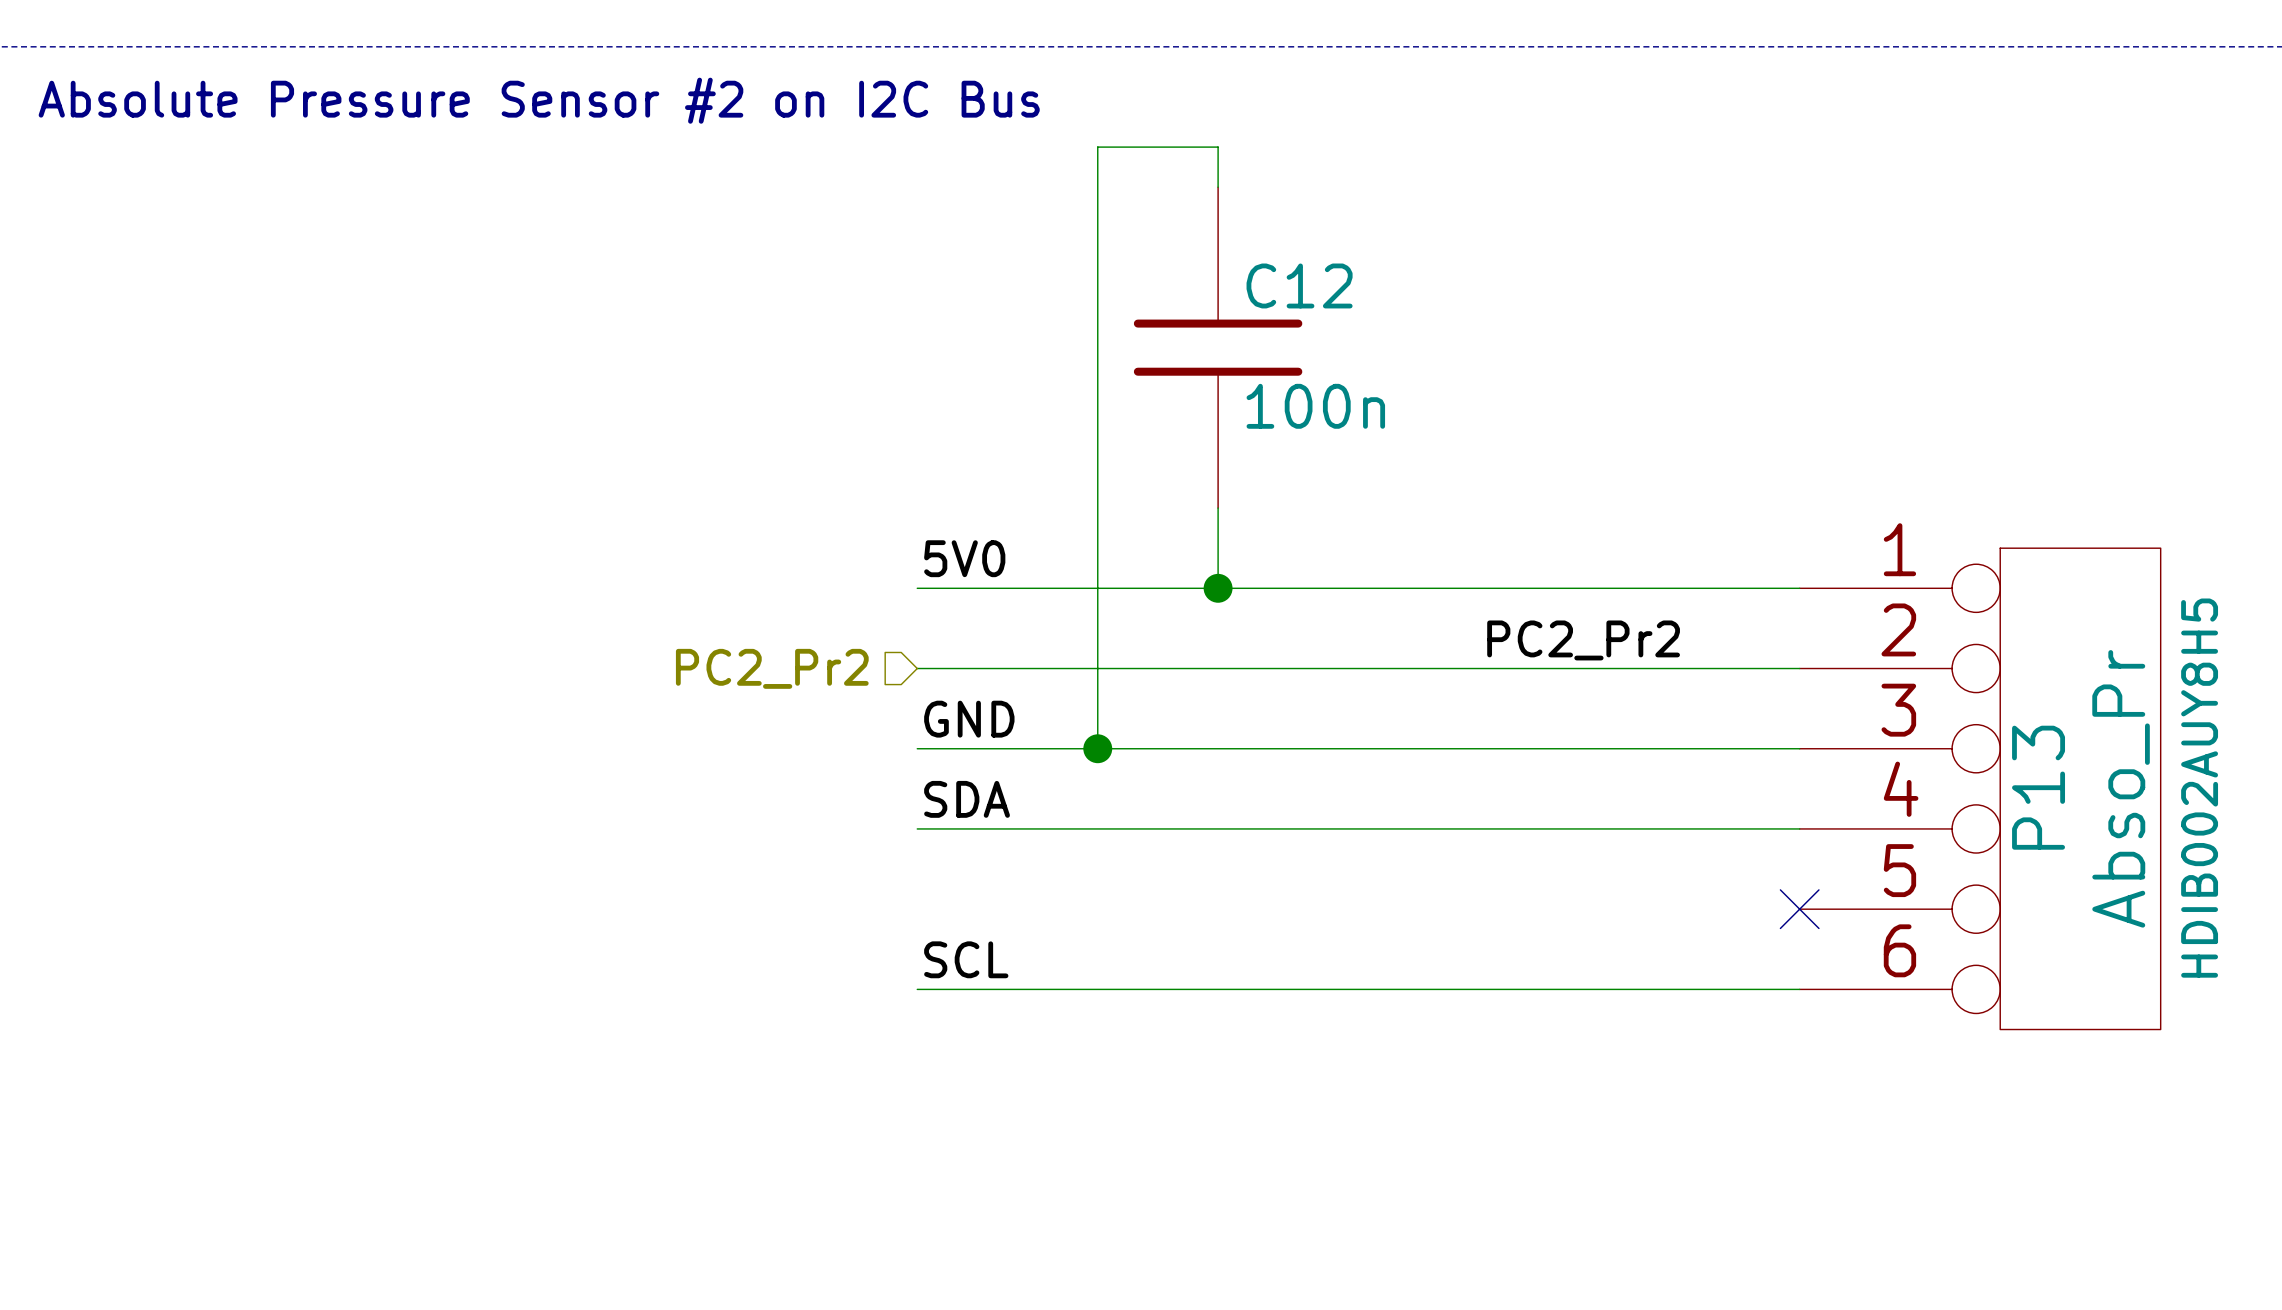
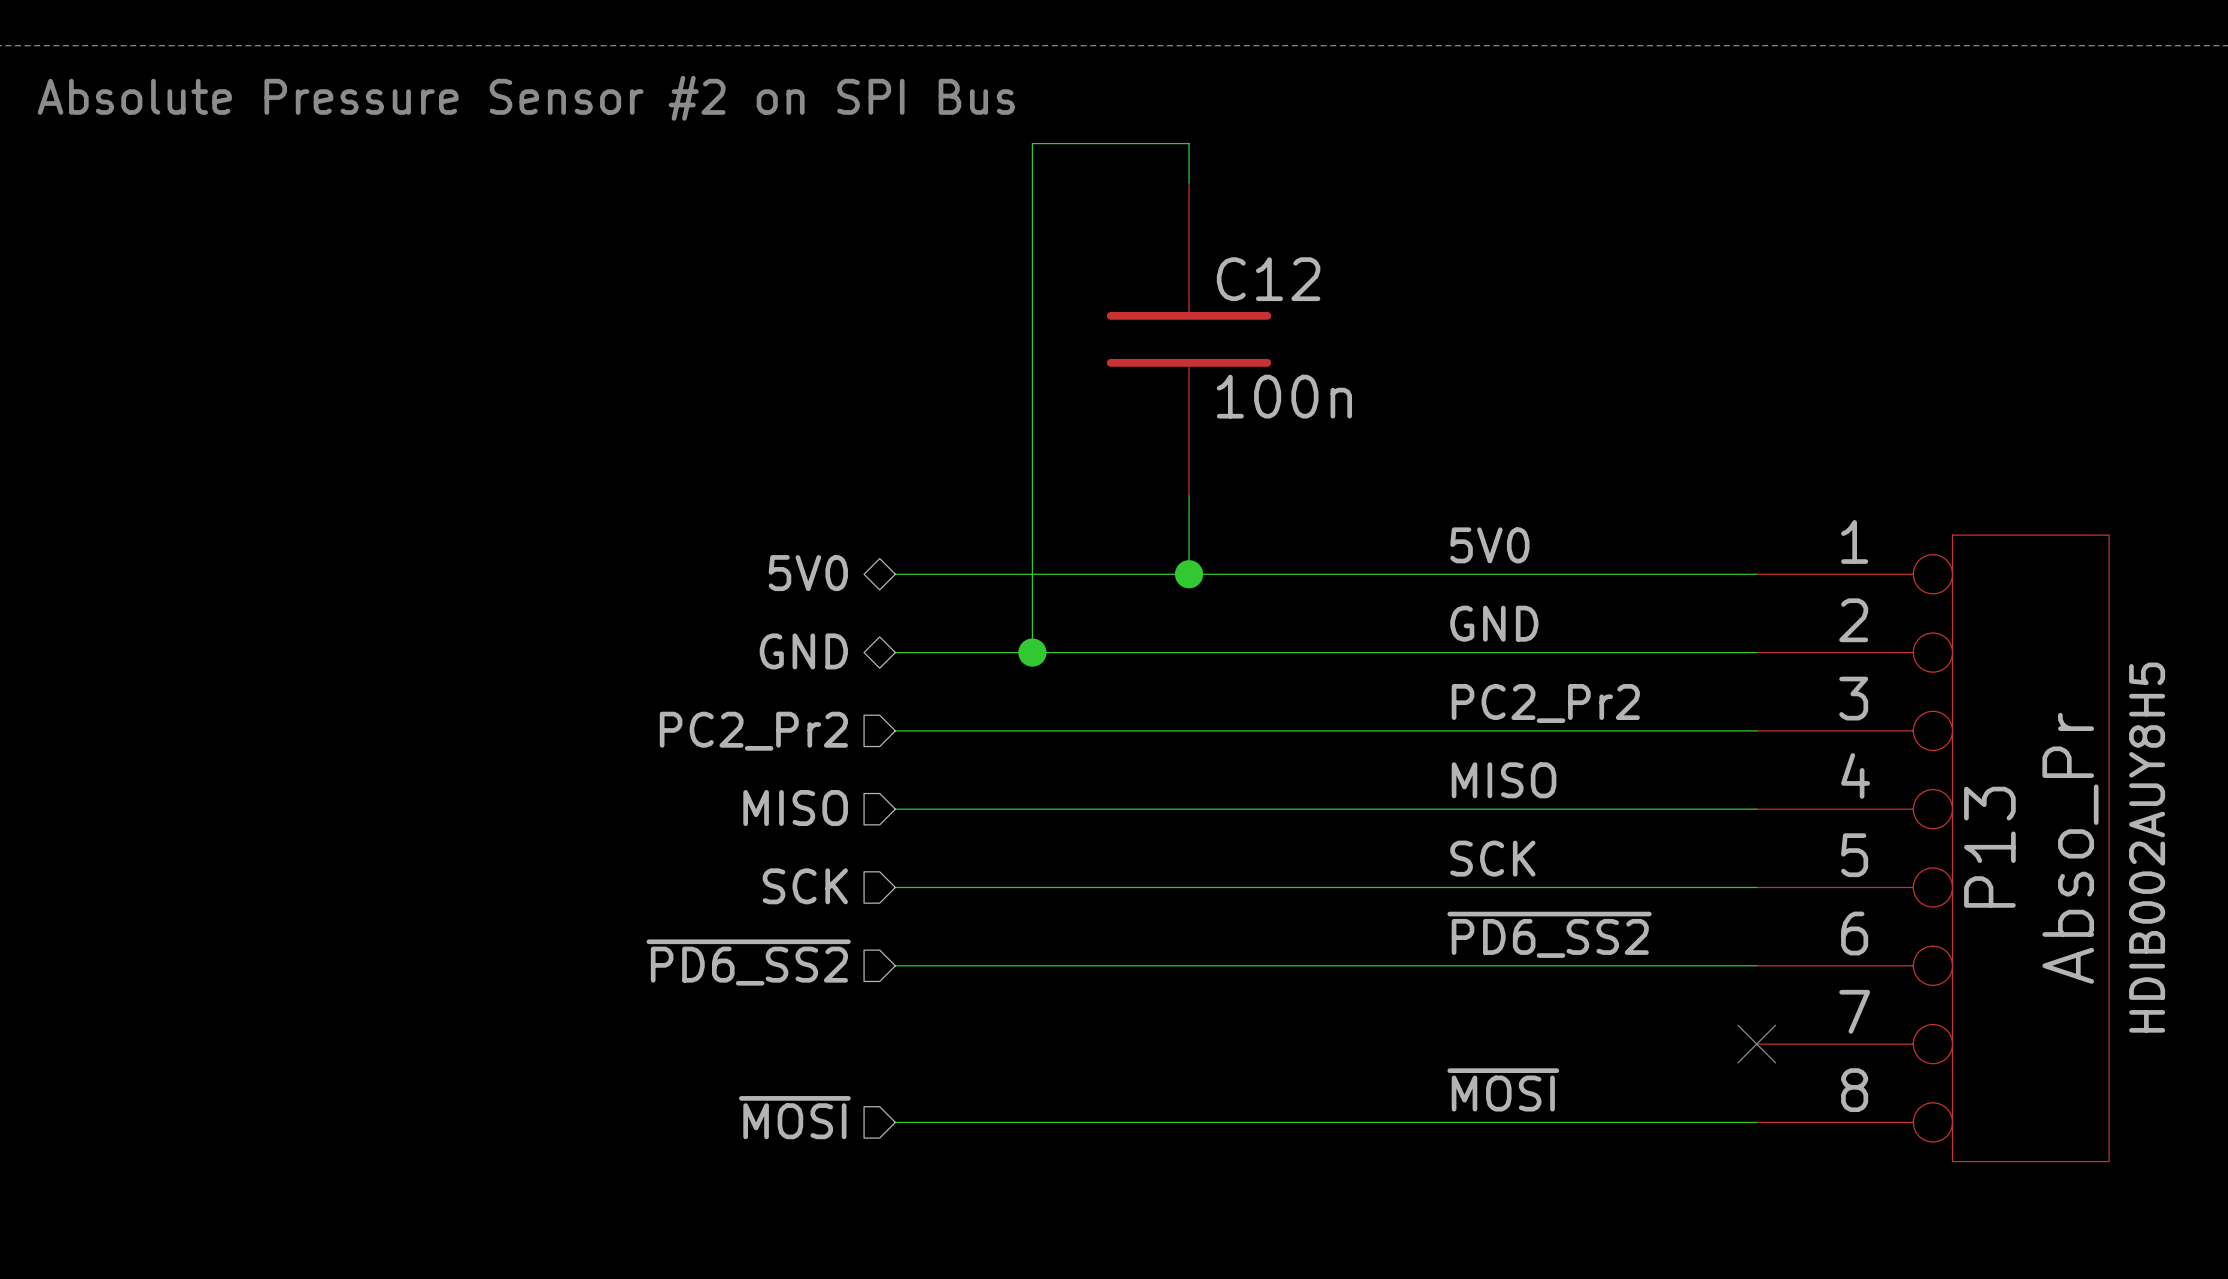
text: Absolute Pressure Sensor #2 on I2C Bus (539, 100) -> Absolute Pressure Sensor #2 on SPI Bus (526, 98)
wire: (1097, 147) (1097, 748) -> (1071, 143) (1032, 143) (1032, 652)
P13 symbol: [1799, 548, 2161, 1030] -> [1756, 535, 2110, 1162]
label position: 5V0 (964, 558) -> 5V0 (1489, 545)
hierarchical label: none -> 5V0 (808, 573)
label: PC2_Pr2 (1583, 640) -> GND (1494, 623)
hierarchical label shape: input (772, 668) -> bidirectional (803, 651)
hierarchical label: PC2_Pr2 (772, 668) -> GND (803, 651)
label: GND (969, 719) -> none
label: none -> PC2_Pr2 (1545, 703)
junction position: (1097, 748) -> (1032, 652)
hierarchical label: none -> PC2_Pr2 (753, 731)
label: SDA (967, 799) -> none
label: none -> MISO (1504, 780)
hierarchical label: none -> MISO (795, 808)
label: none -> SCK (1492, 858)
hierarchical label: none -> SCK (805, 886)
wire: none -> (895, 887) (1756, 887)
no-connect mark position: (1799, 909) -> (1756, 1044)
label: none -> ~{PD6_SS2} (1549, 934)
label: SCL (966, 959) -> none
hierarchical label: none -> ~{PD6_SS2} (748, 962)
label: none -> ~{MOSI} (1503, 1089)
hierarchical label: none -> ~{MOSI} (794, 1117)
wire: none -> (895, 1122) (1756, 1122)

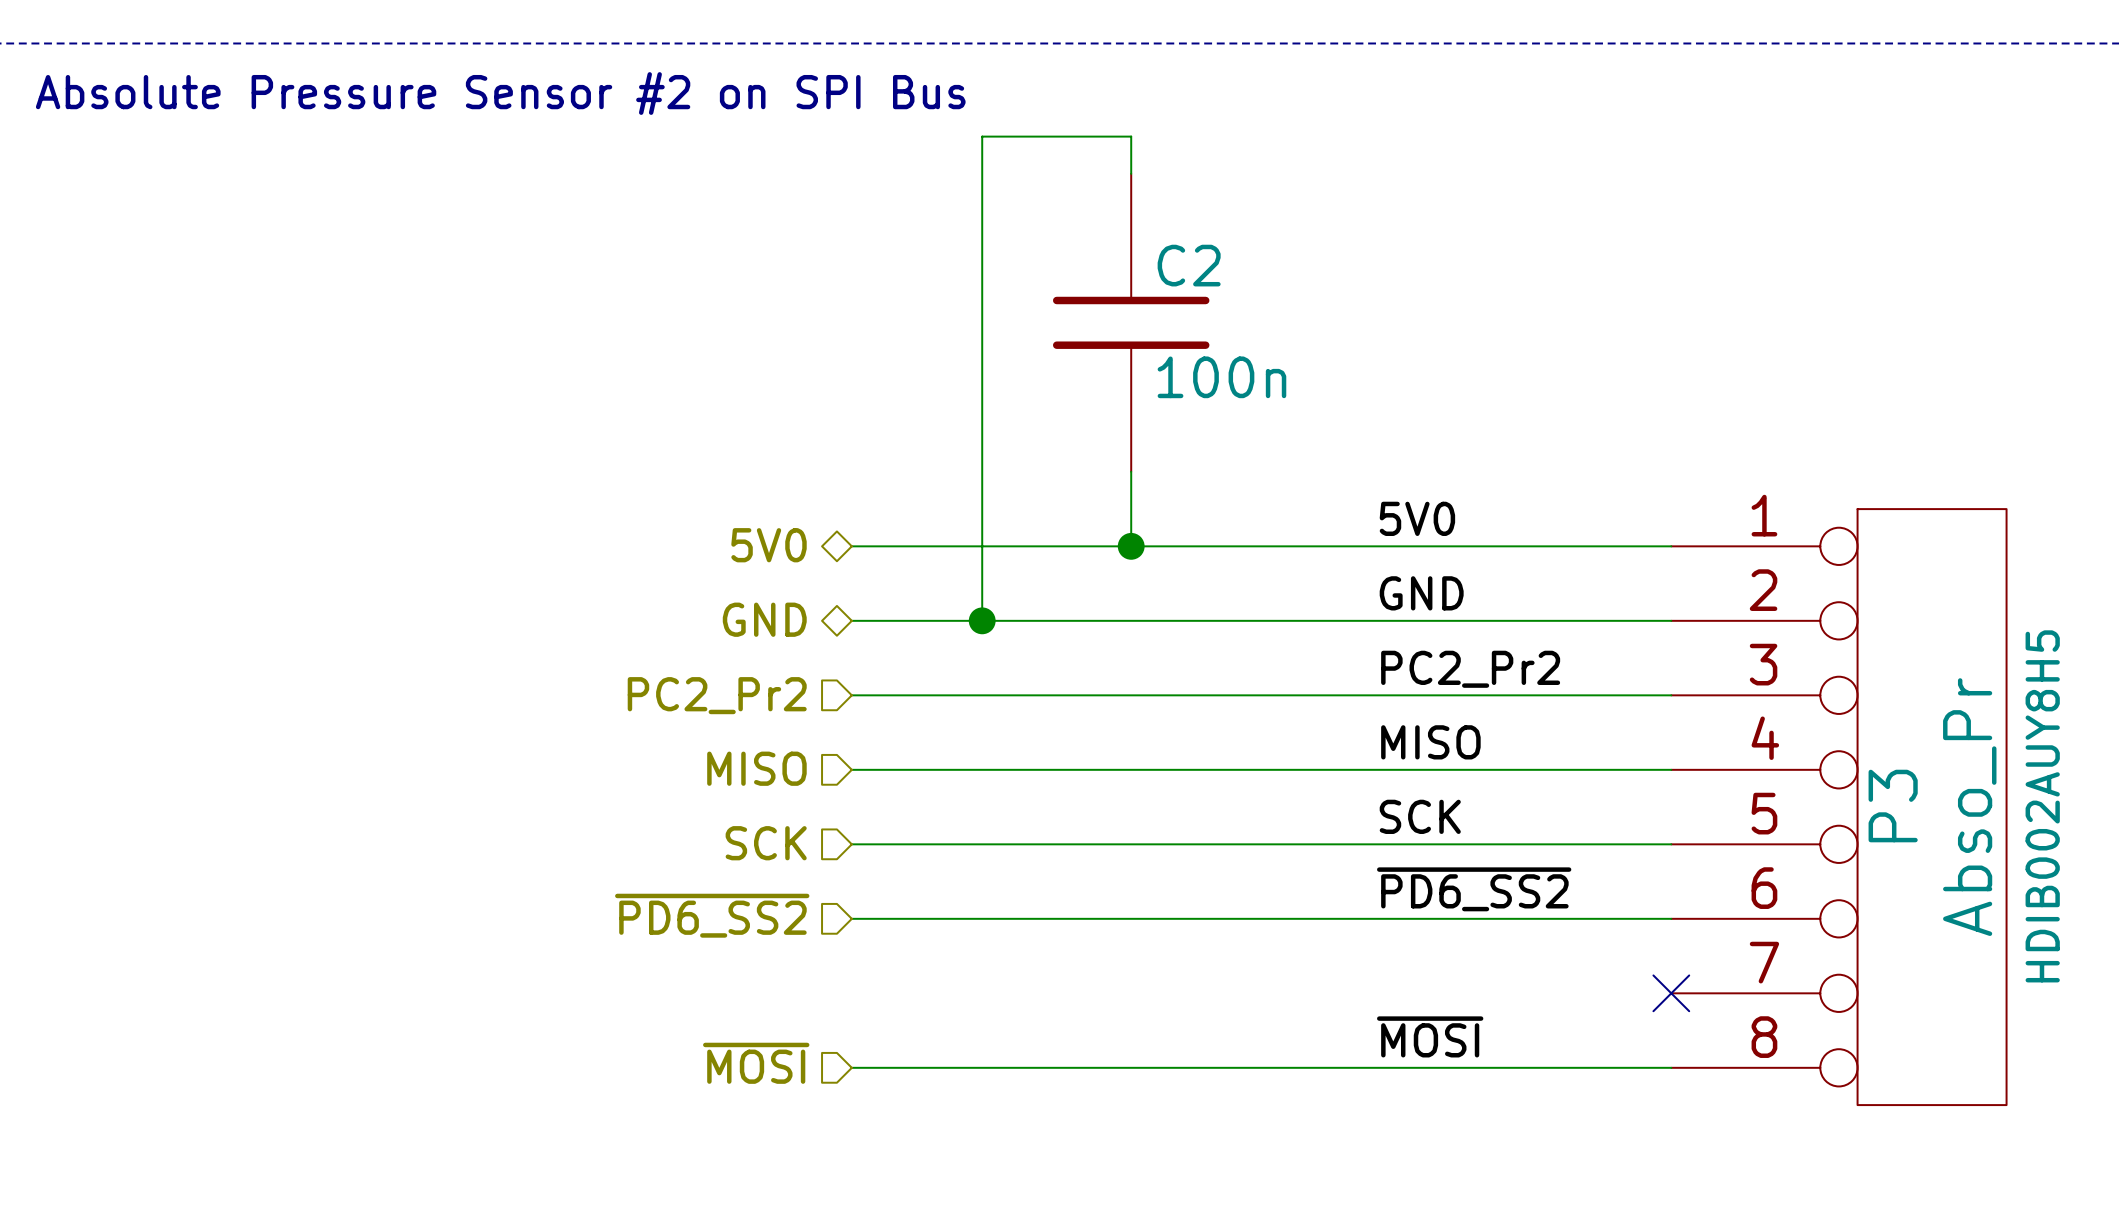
C12 name: C12 (1268, 279) -> C2 (1189, 265)
P13 name: P13 (1989, 847) -> P3 (1893, 806)

